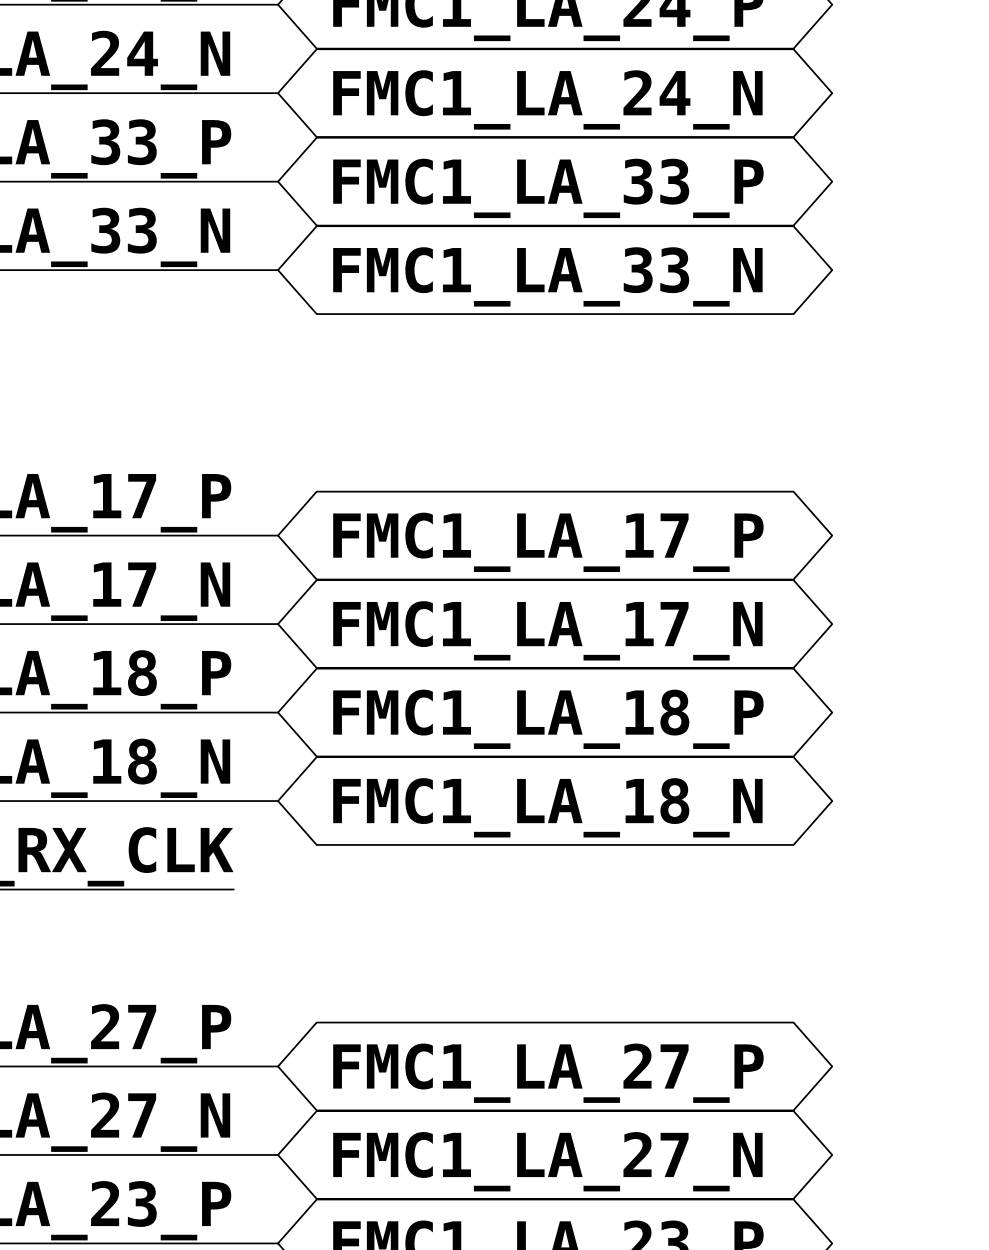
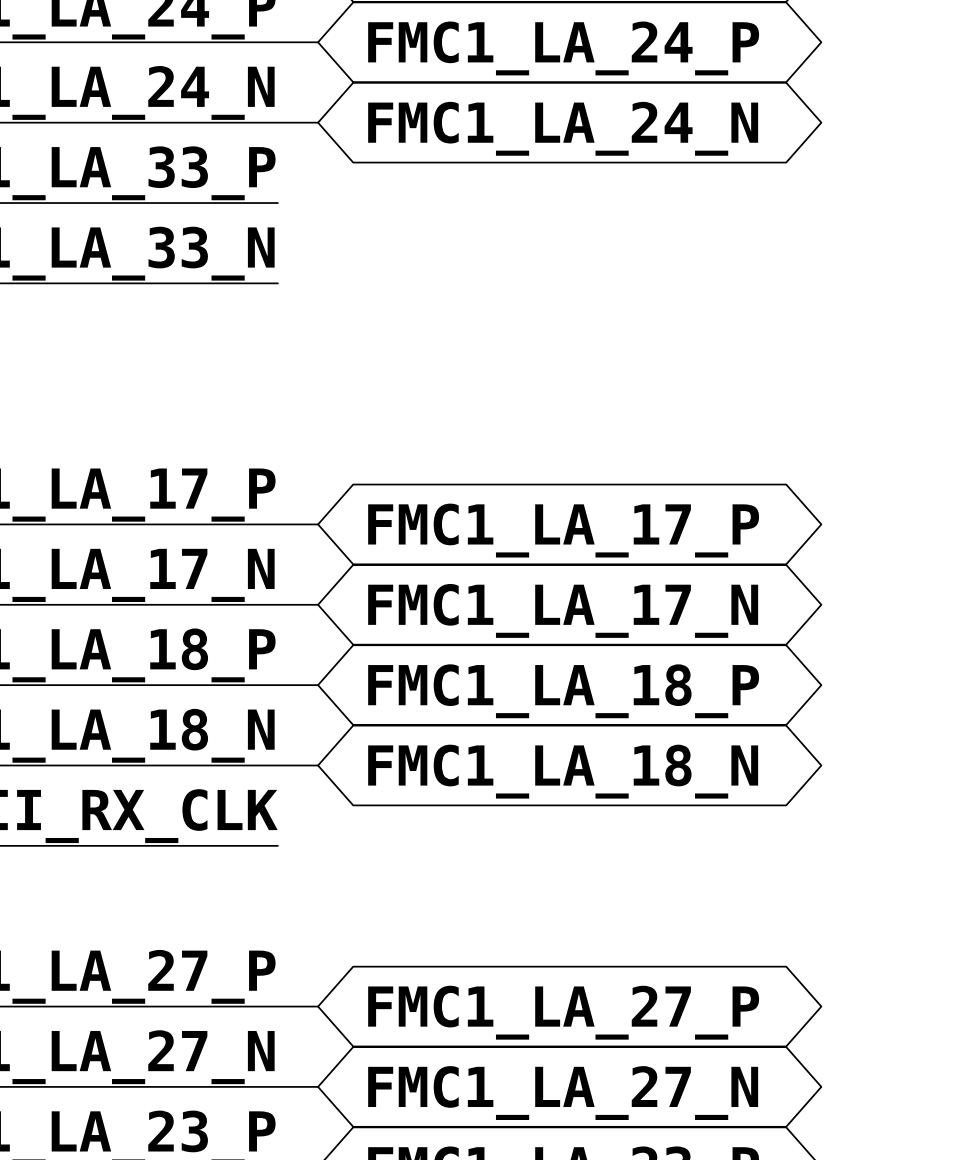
wire: (233, 181) (278, 181) -> none
global label: FMC1_LA_33_P (548, 188) -> none
wire: (233, 270) (278, 270) -> none
global label: FMC1_LA_33_N (547, 276) -> none

